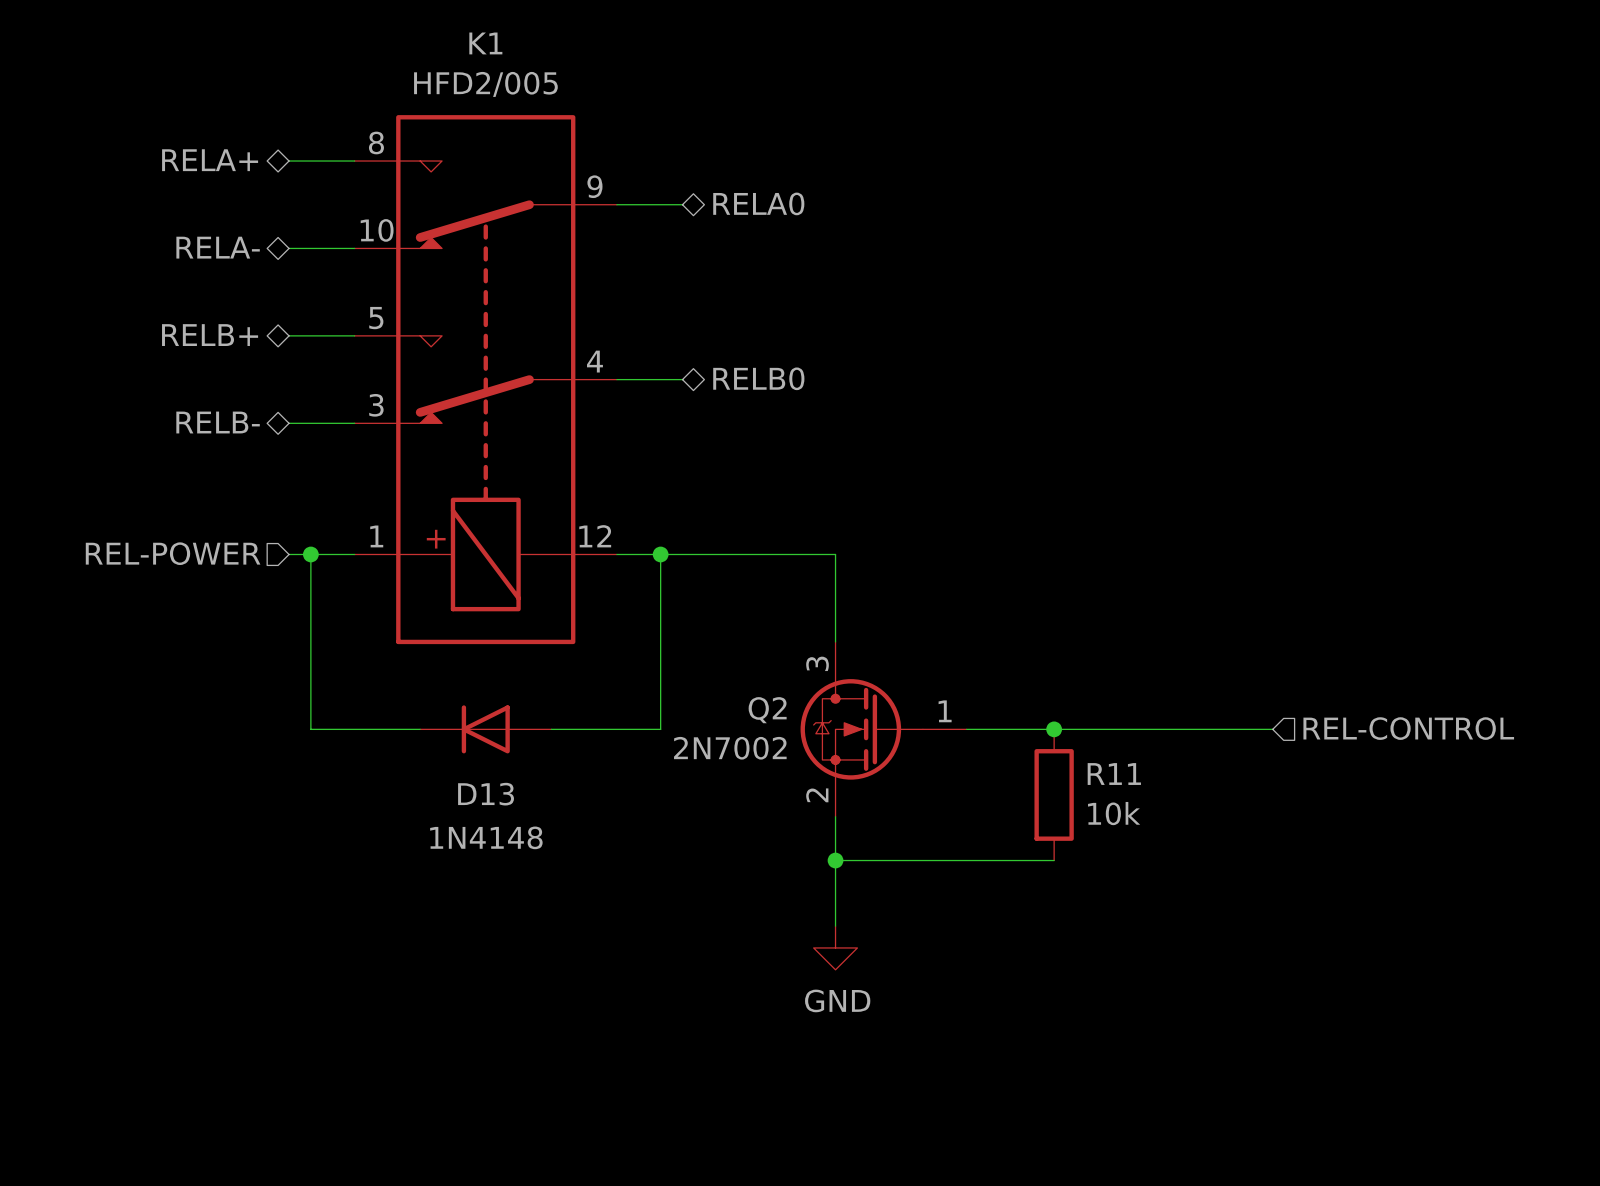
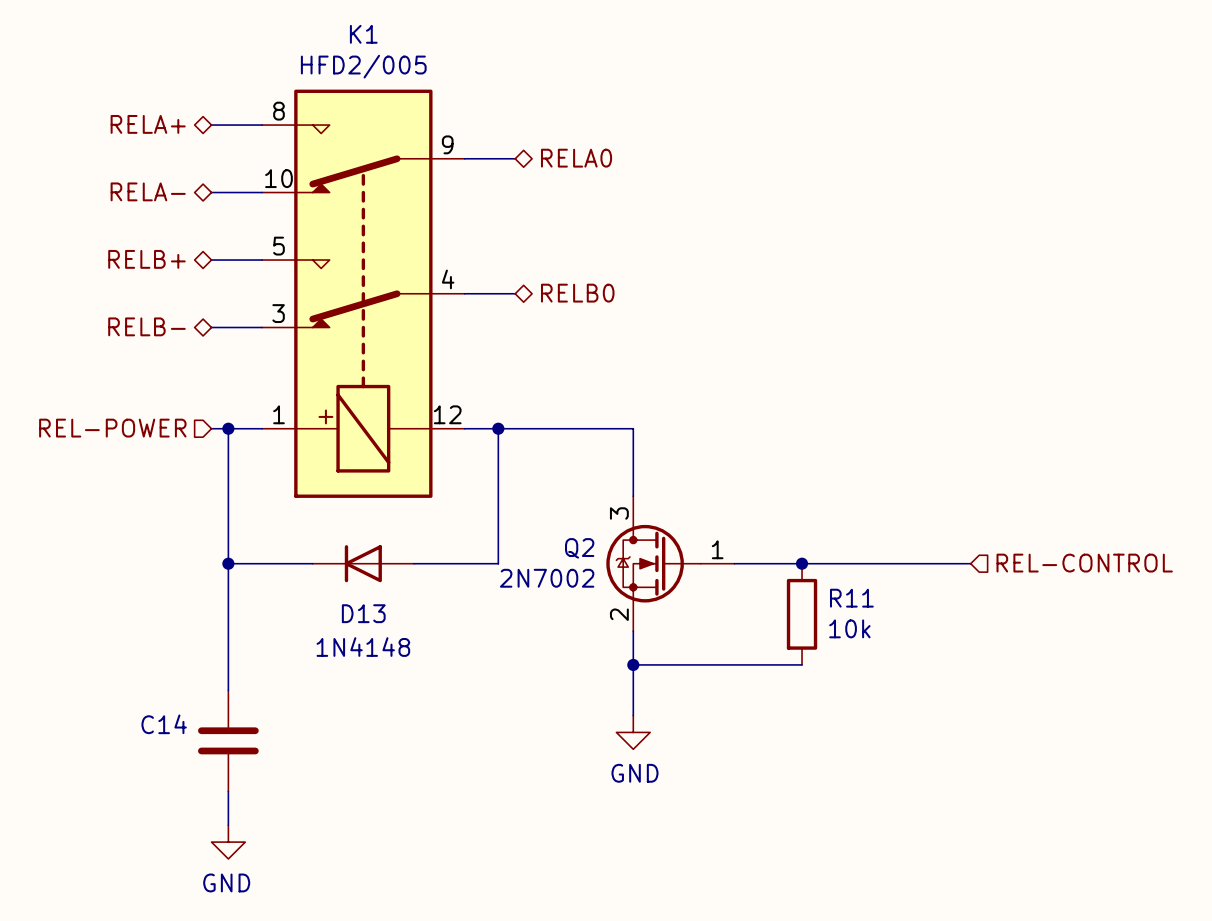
wire: none -> (228, 563) (228, 690)
junction: none -> (228, 563)
C14: none -> (228, 740)
wire: none -> (228, 791) (228, 825)
power symbol: none -> GND (228, 842)

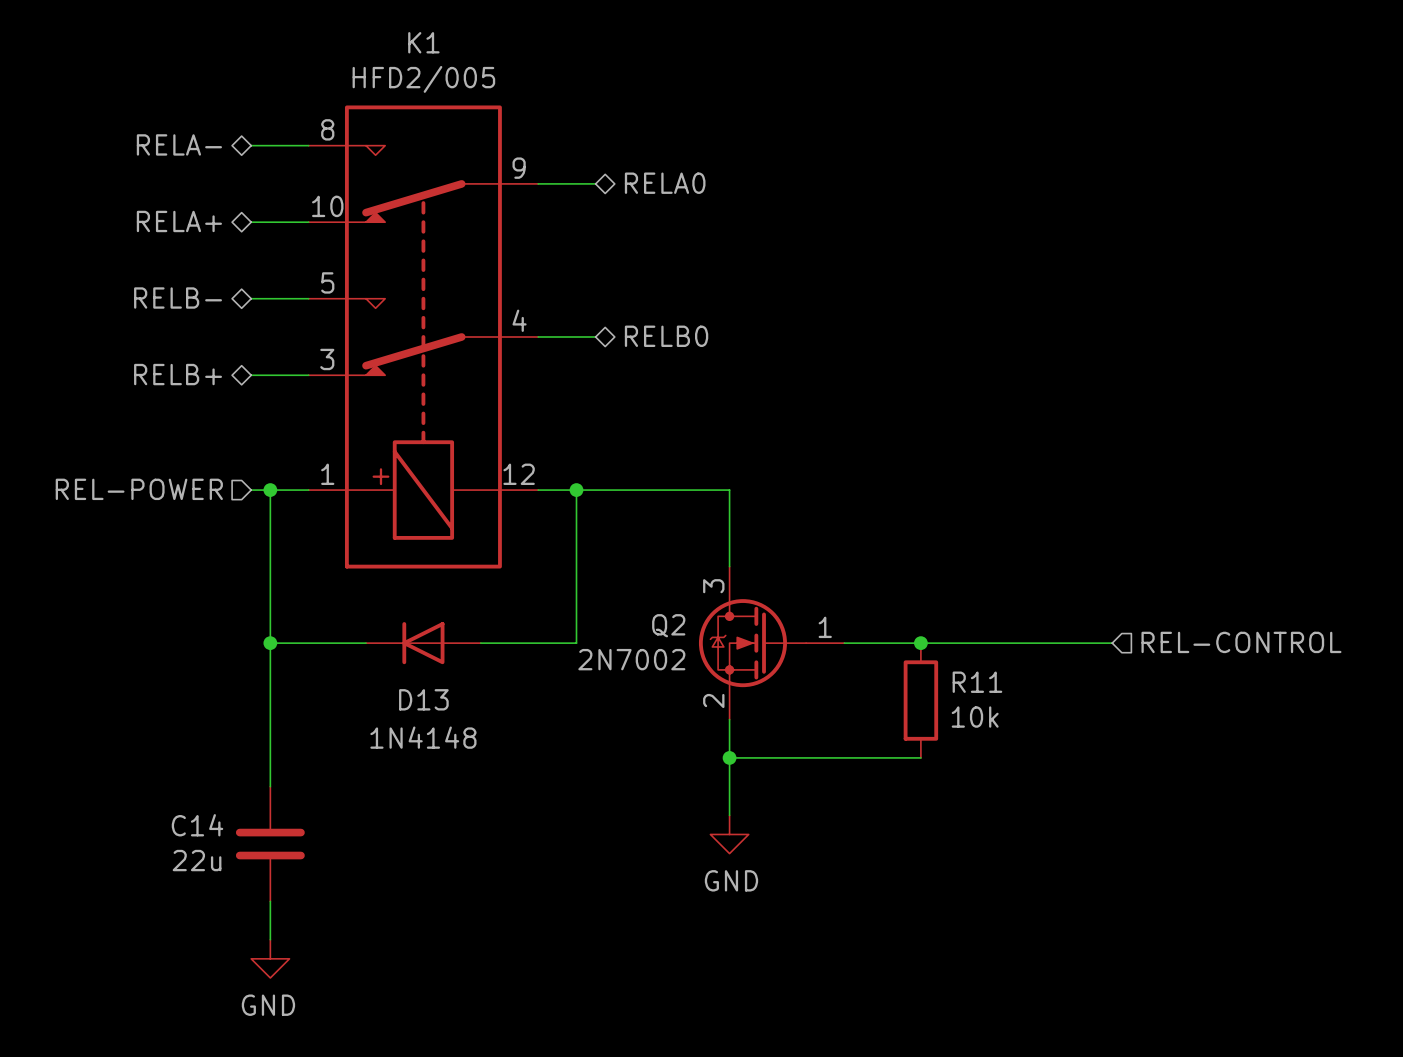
hierarchical label: RELA+ (148, 124) -> RELA- (179, 144)
hierarchical label: RELA- (148, 191) -> RELA+ (179, 221)
hierarchical label: RELB+ (146, 259) -> RELB- (178, 298)
hierarchical label: RELB- (146, 326) -> RELB+ (178, 374)
C14 value: none -> 22u (197, 860)

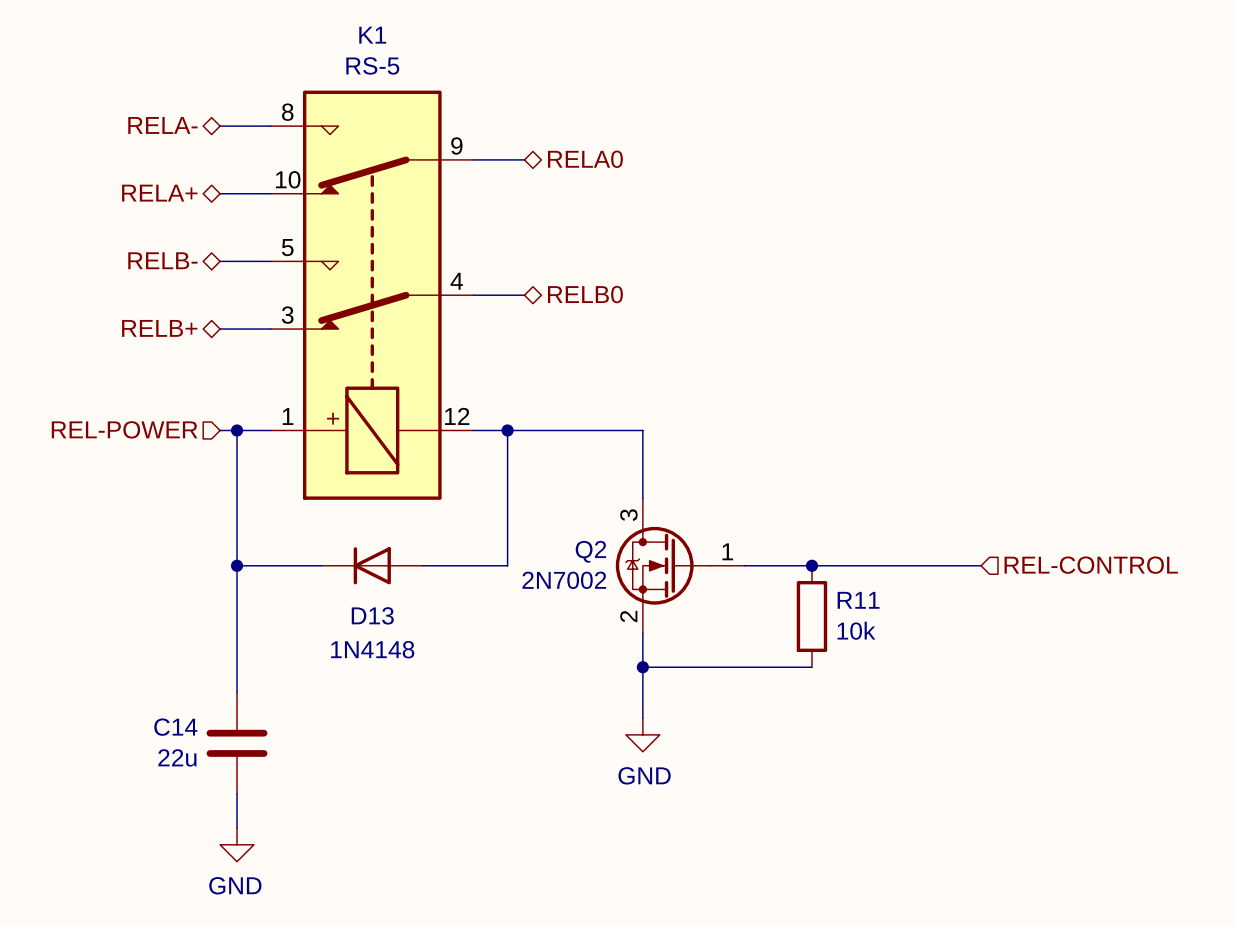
K1 value: HFD2/005 (423, 79) -> RS-5 (372, 65)

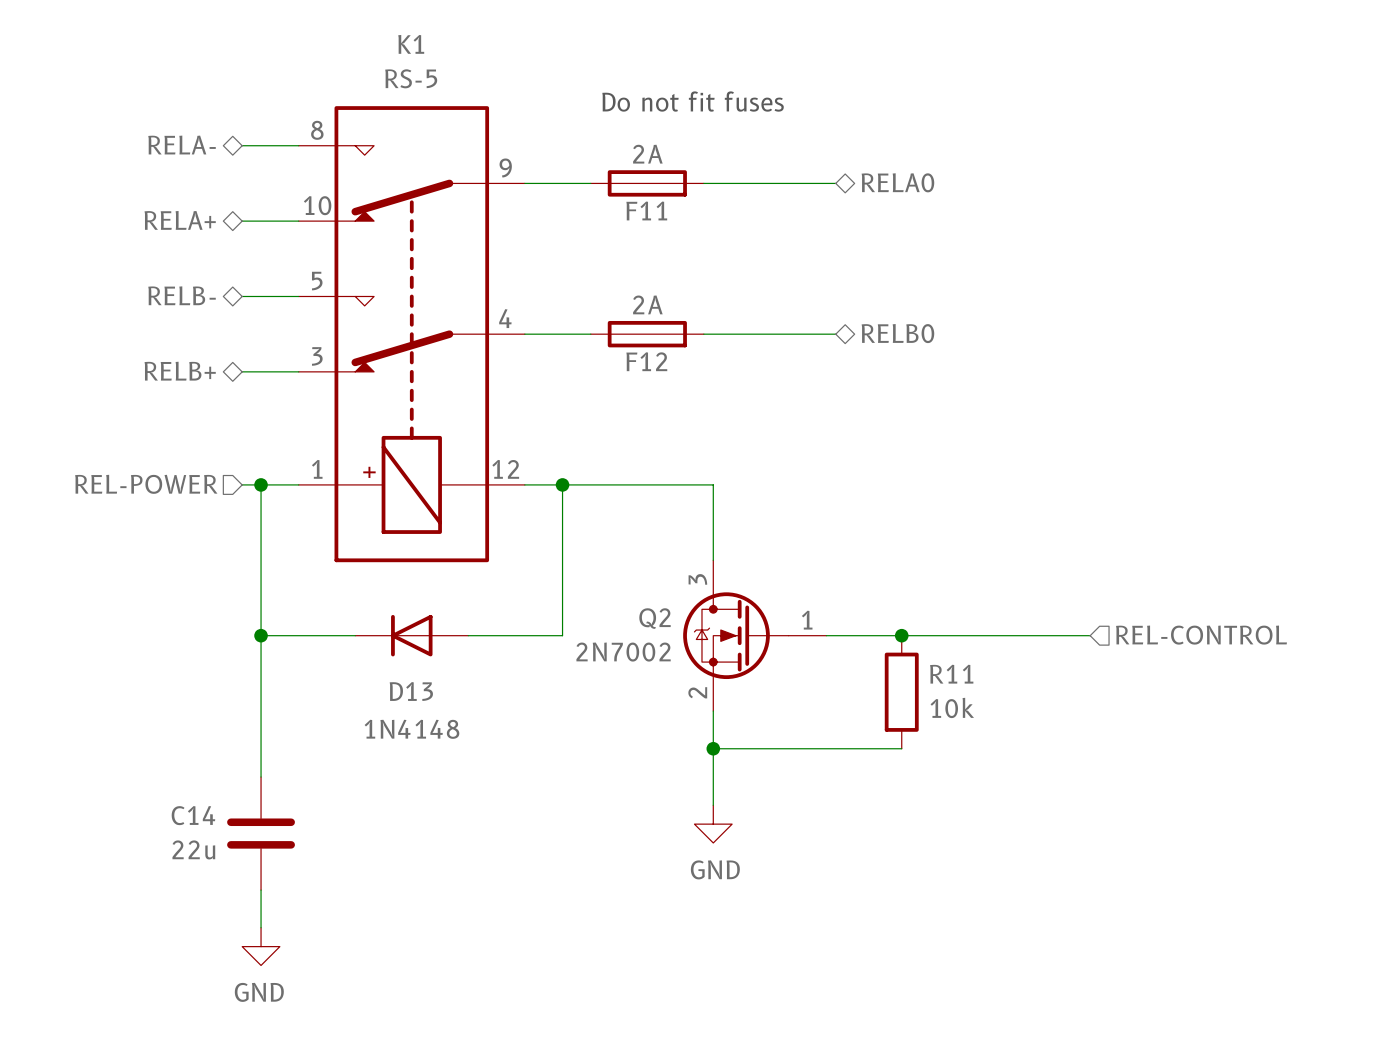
text: none -> Do not fit fuses (693, 101)
wire: none -> (581, 183) (590, 183)
F11: none -> 2A (647, 183)
hierarchical label position: RELA0 (585, 159) -> RELA0 (897, 182)
wire: none -> (703, 183) (835, 183)
hierarchical label position: RELB0 (585, 294) -> RELB0 (897, 333)
wire: none -> (581, 334) (590, 334)
F12: none -> 2A (647, 334)
wire: none -> (703, 334) (835, 334)

